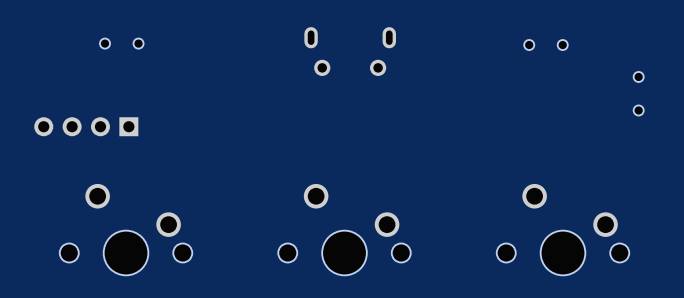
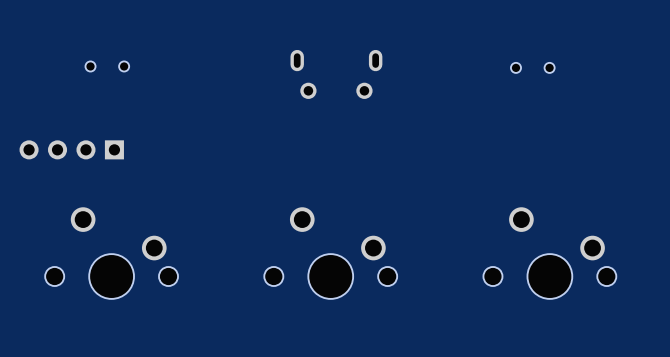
part: (638, 93) -> none

